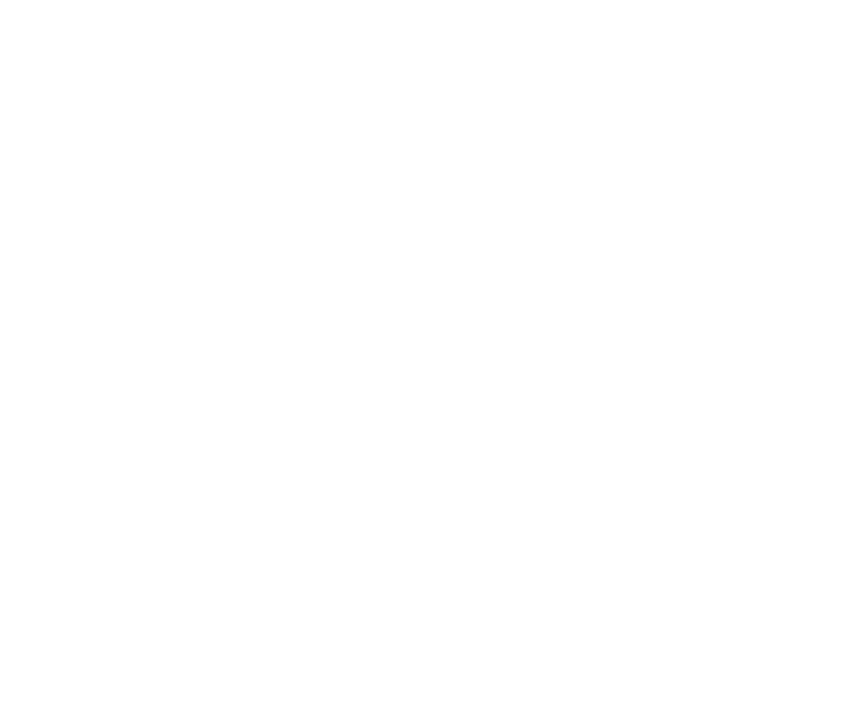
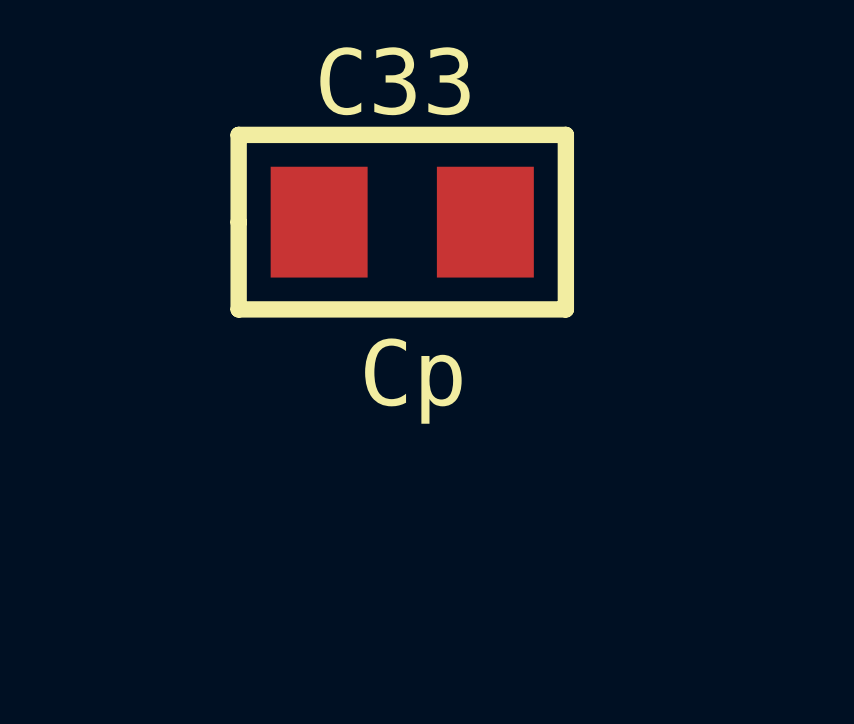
C33: none -> Cp (402, 222)

